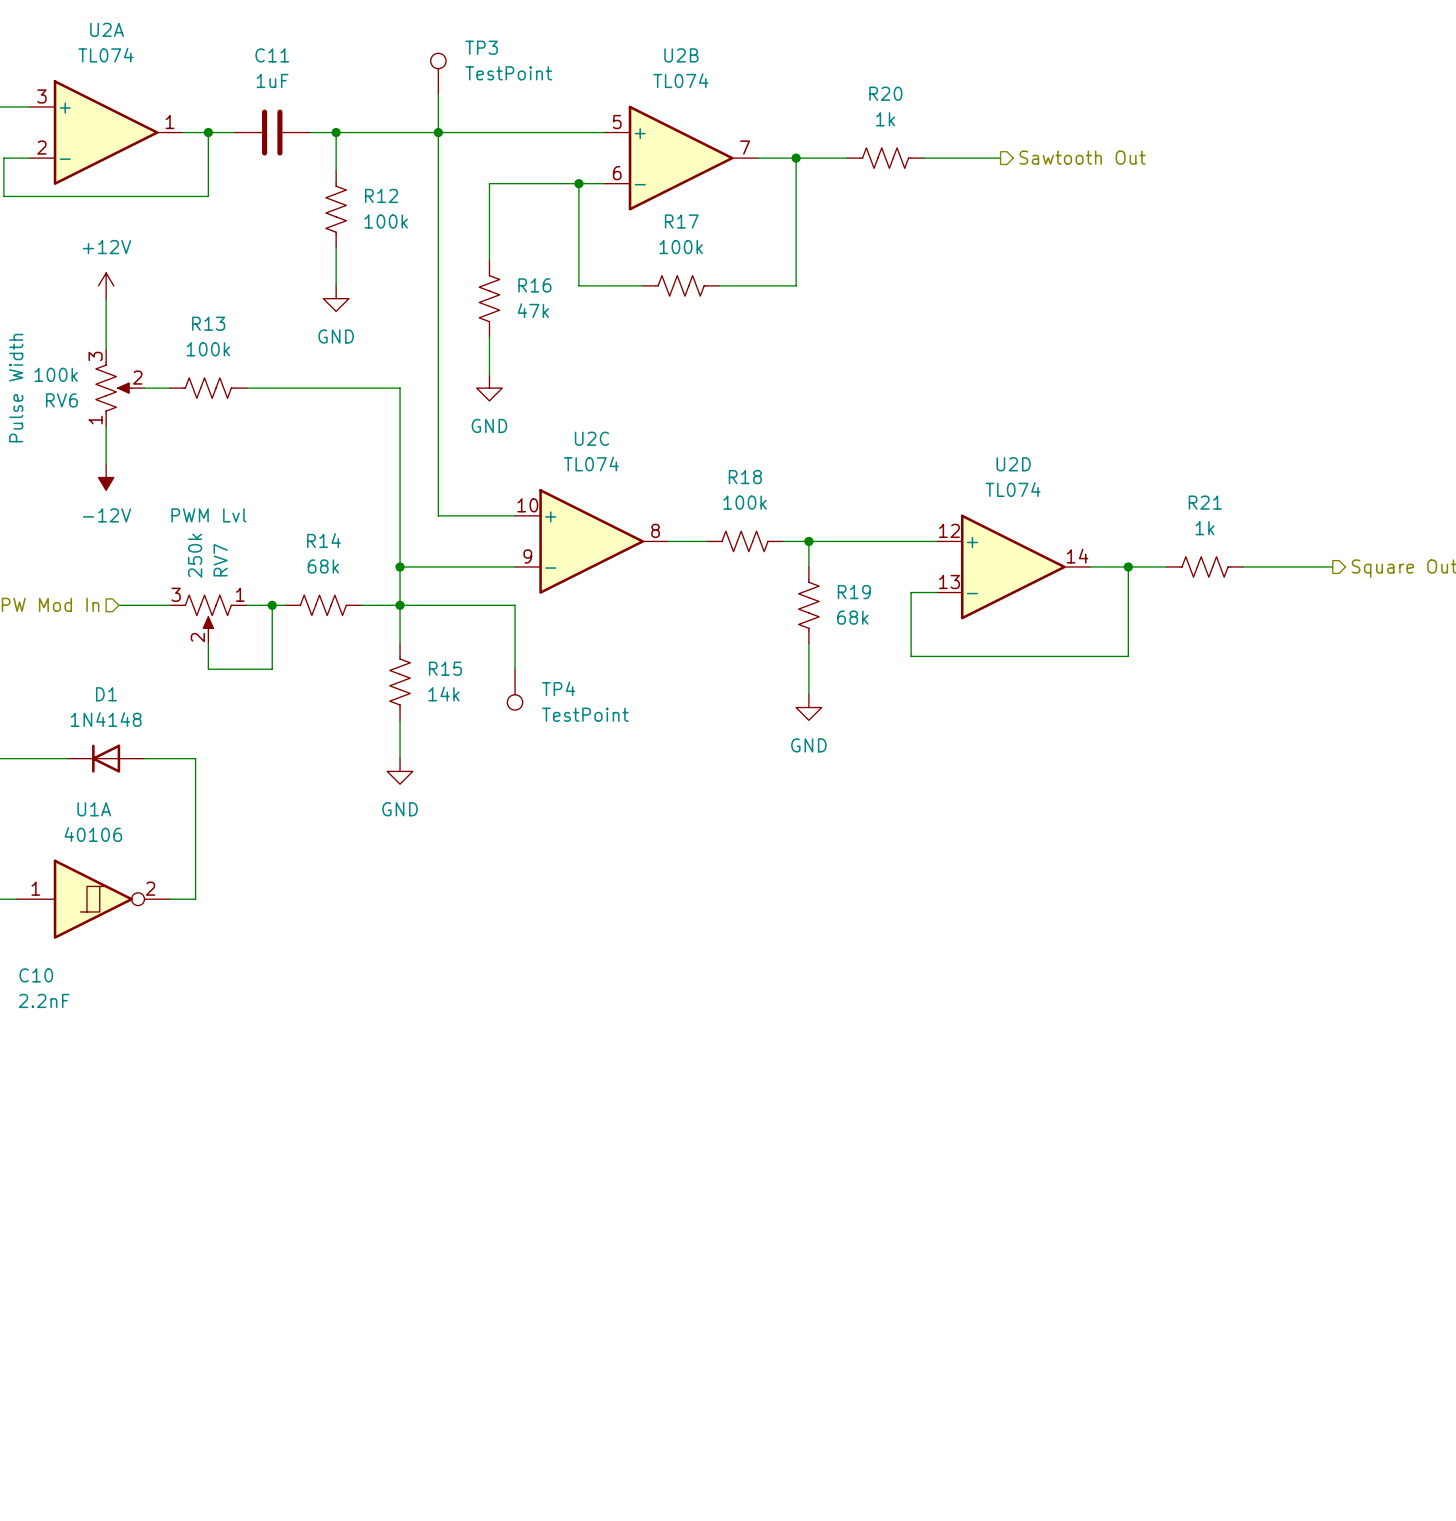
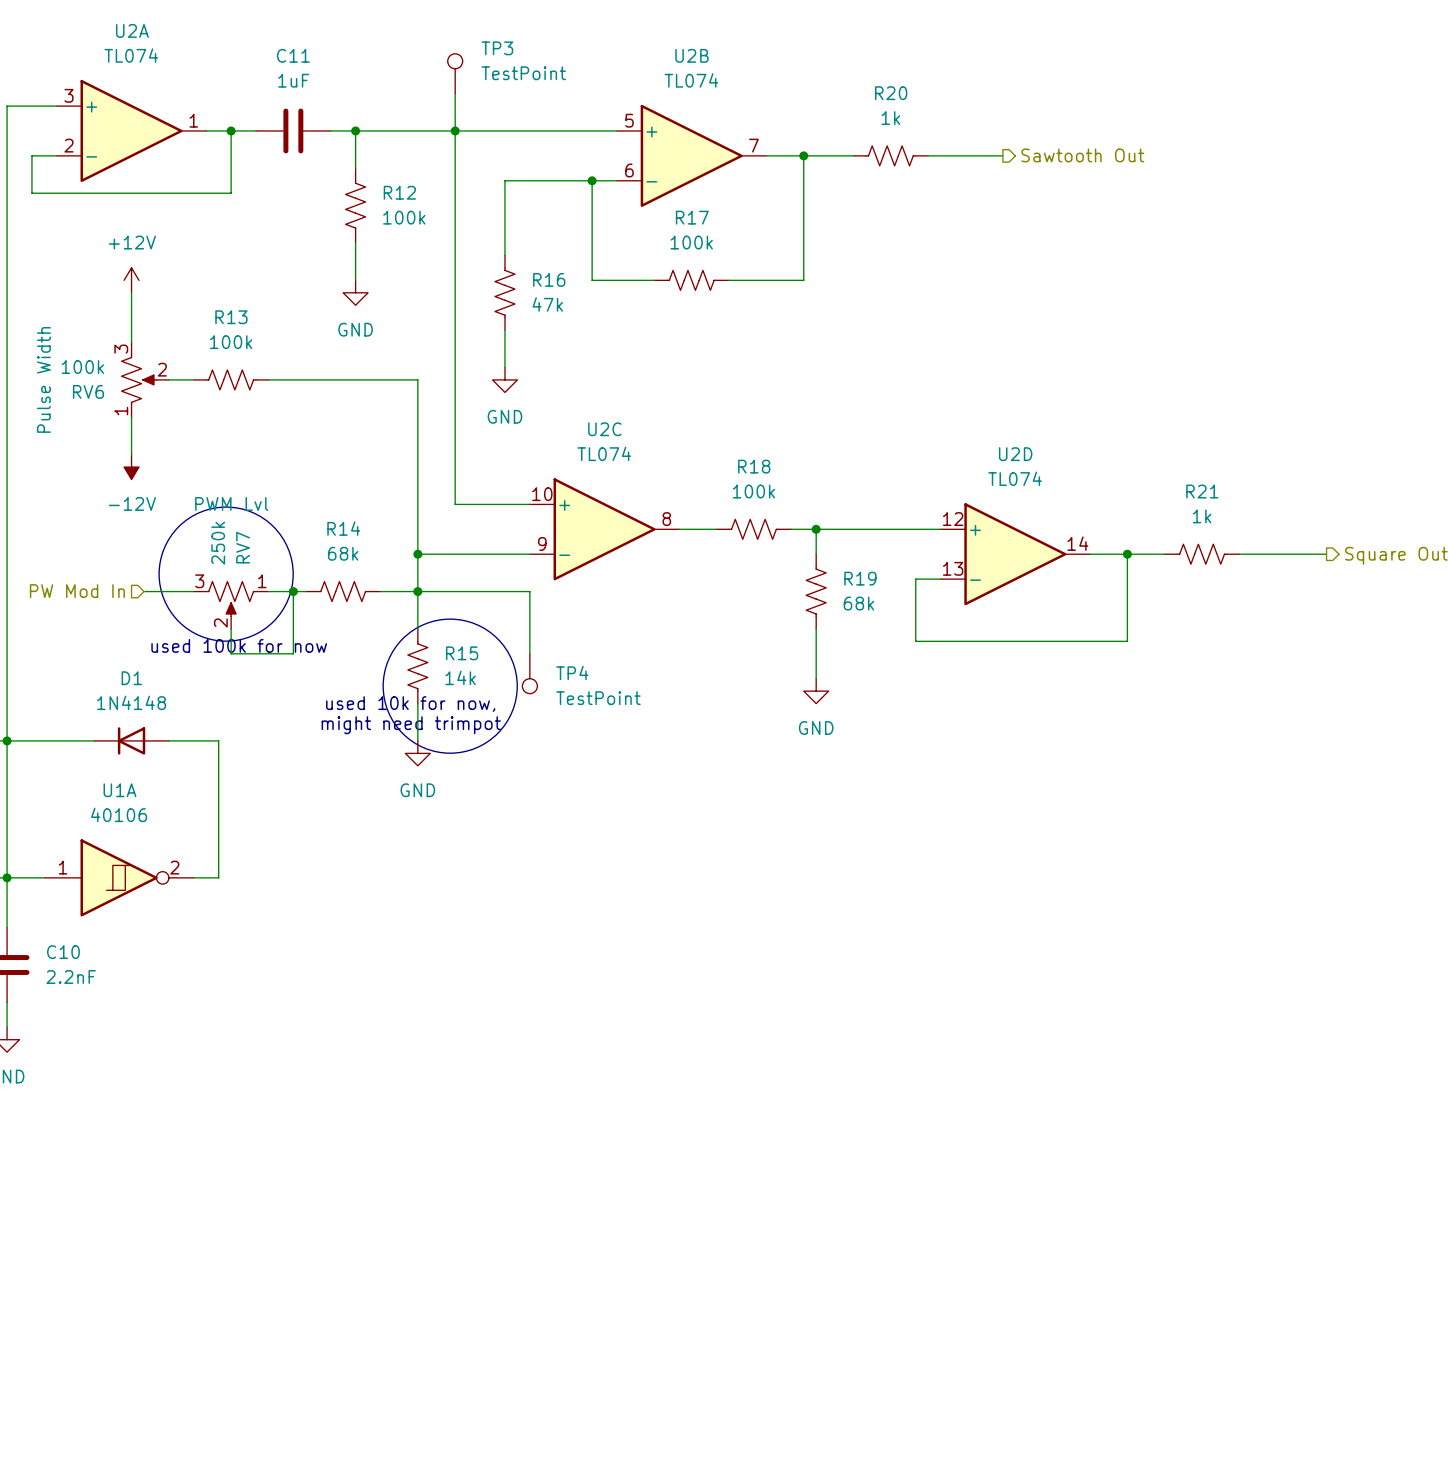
drawing: none -> [159, 507, 294, 642]
drawing: none -> [383, 619, 518, 754]
text: none -> used 100k for now (239, 645)
text: none -> used 10k for now, (410, 704)
text: none -> might need trimpot (411, 725)

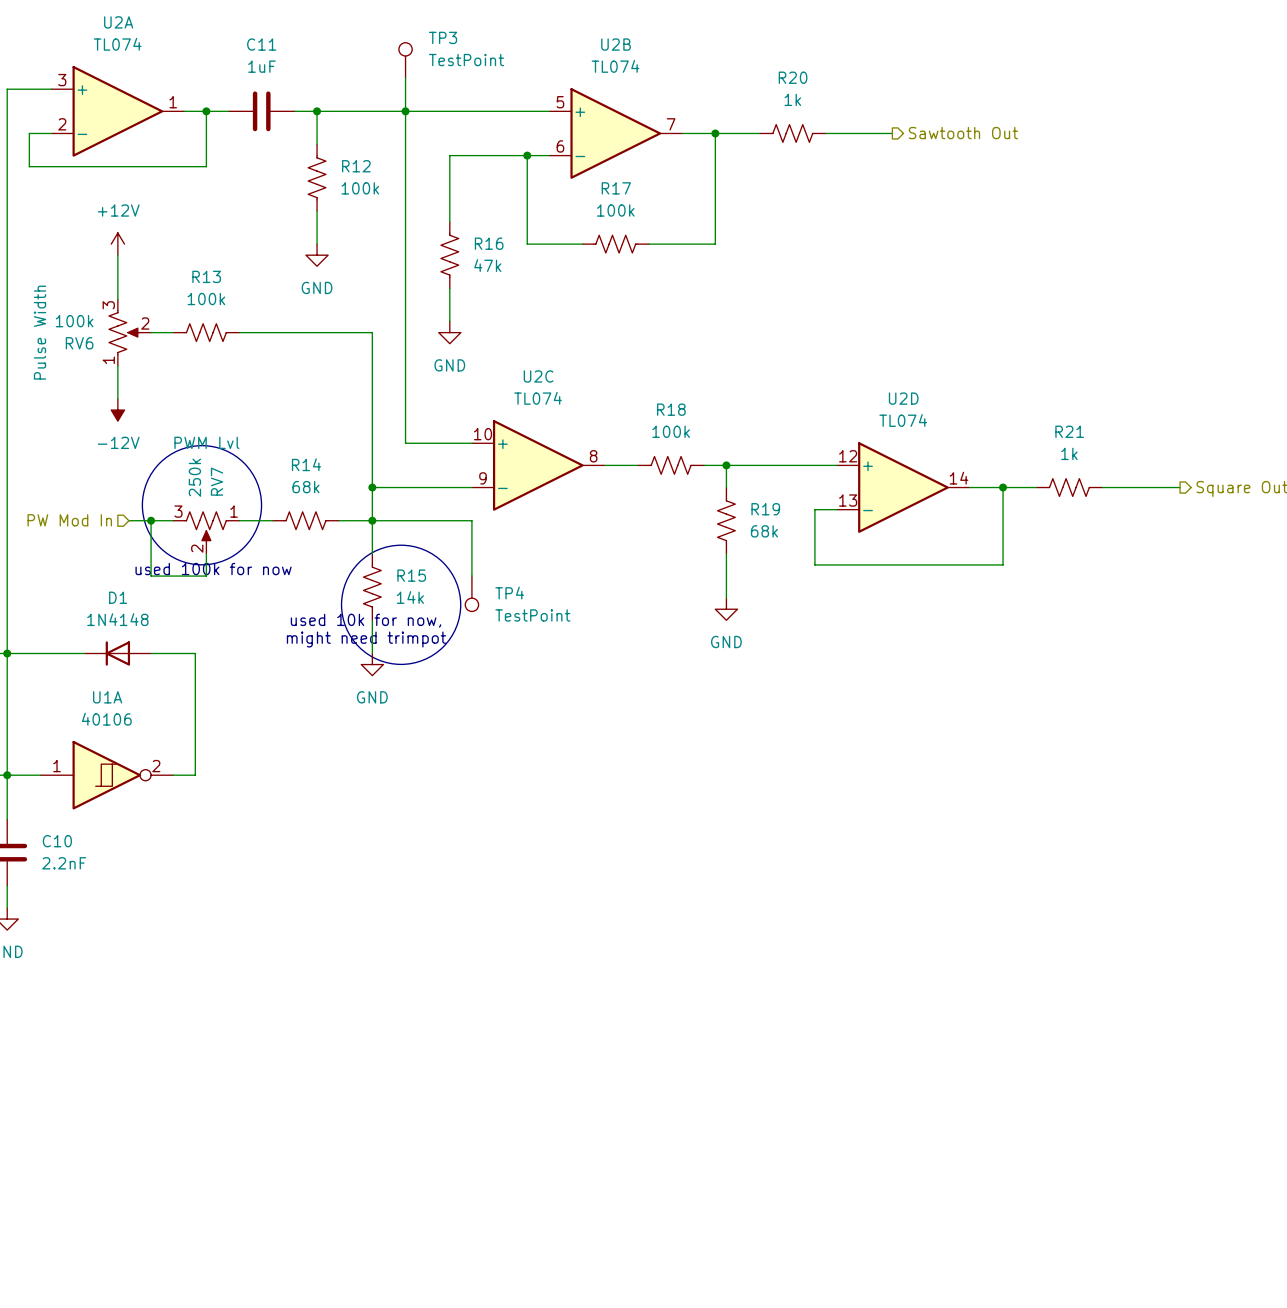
junction: none -> (151, 520)
wire: (293, 591) (293, 653) (231, 653) -> (151, 520) (151, 576) (206, 576)
junction: (293, 591) -> none

